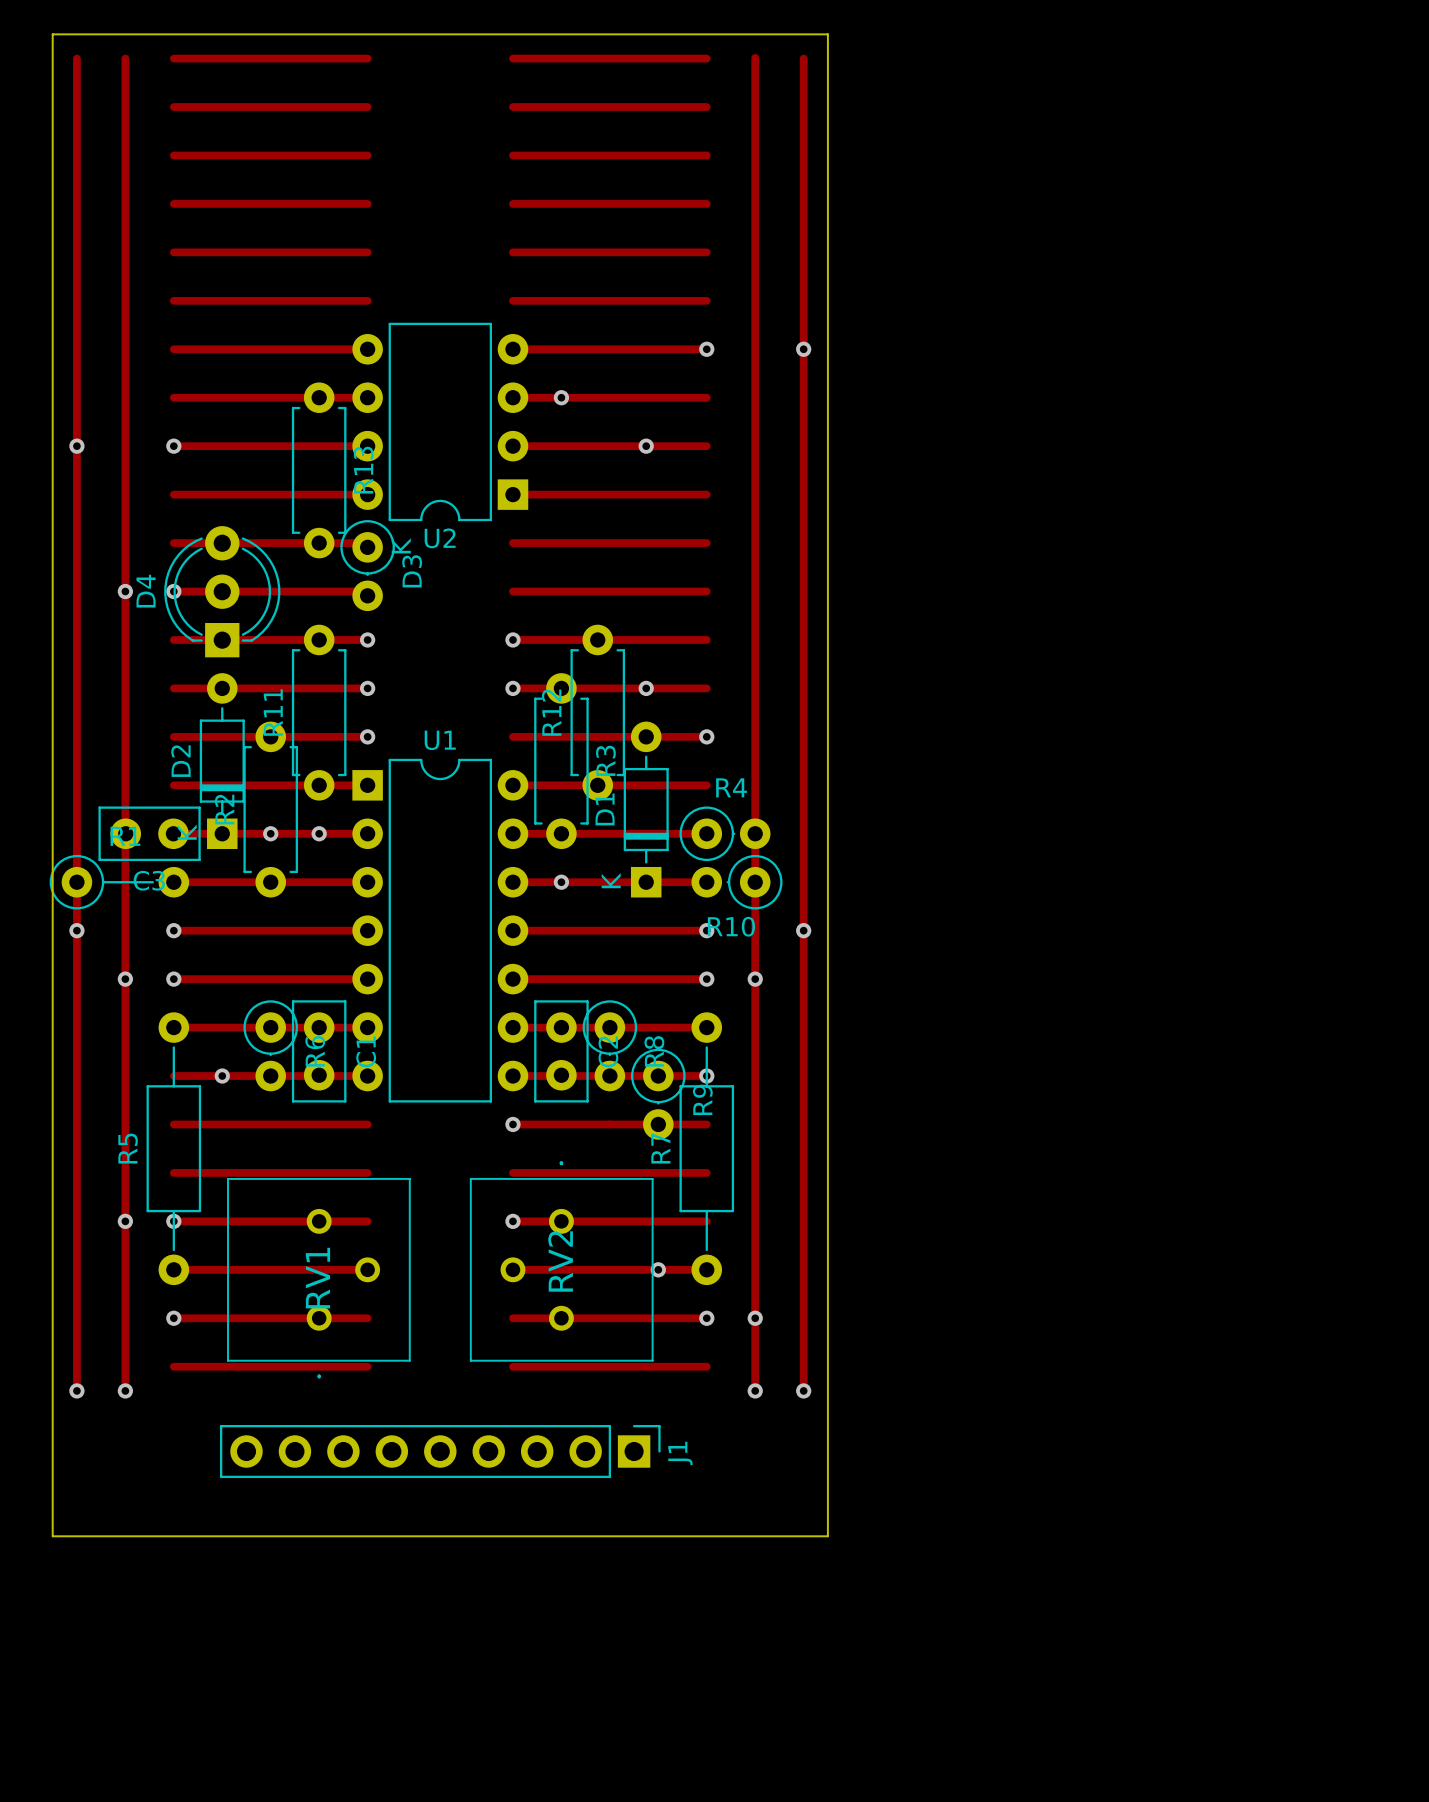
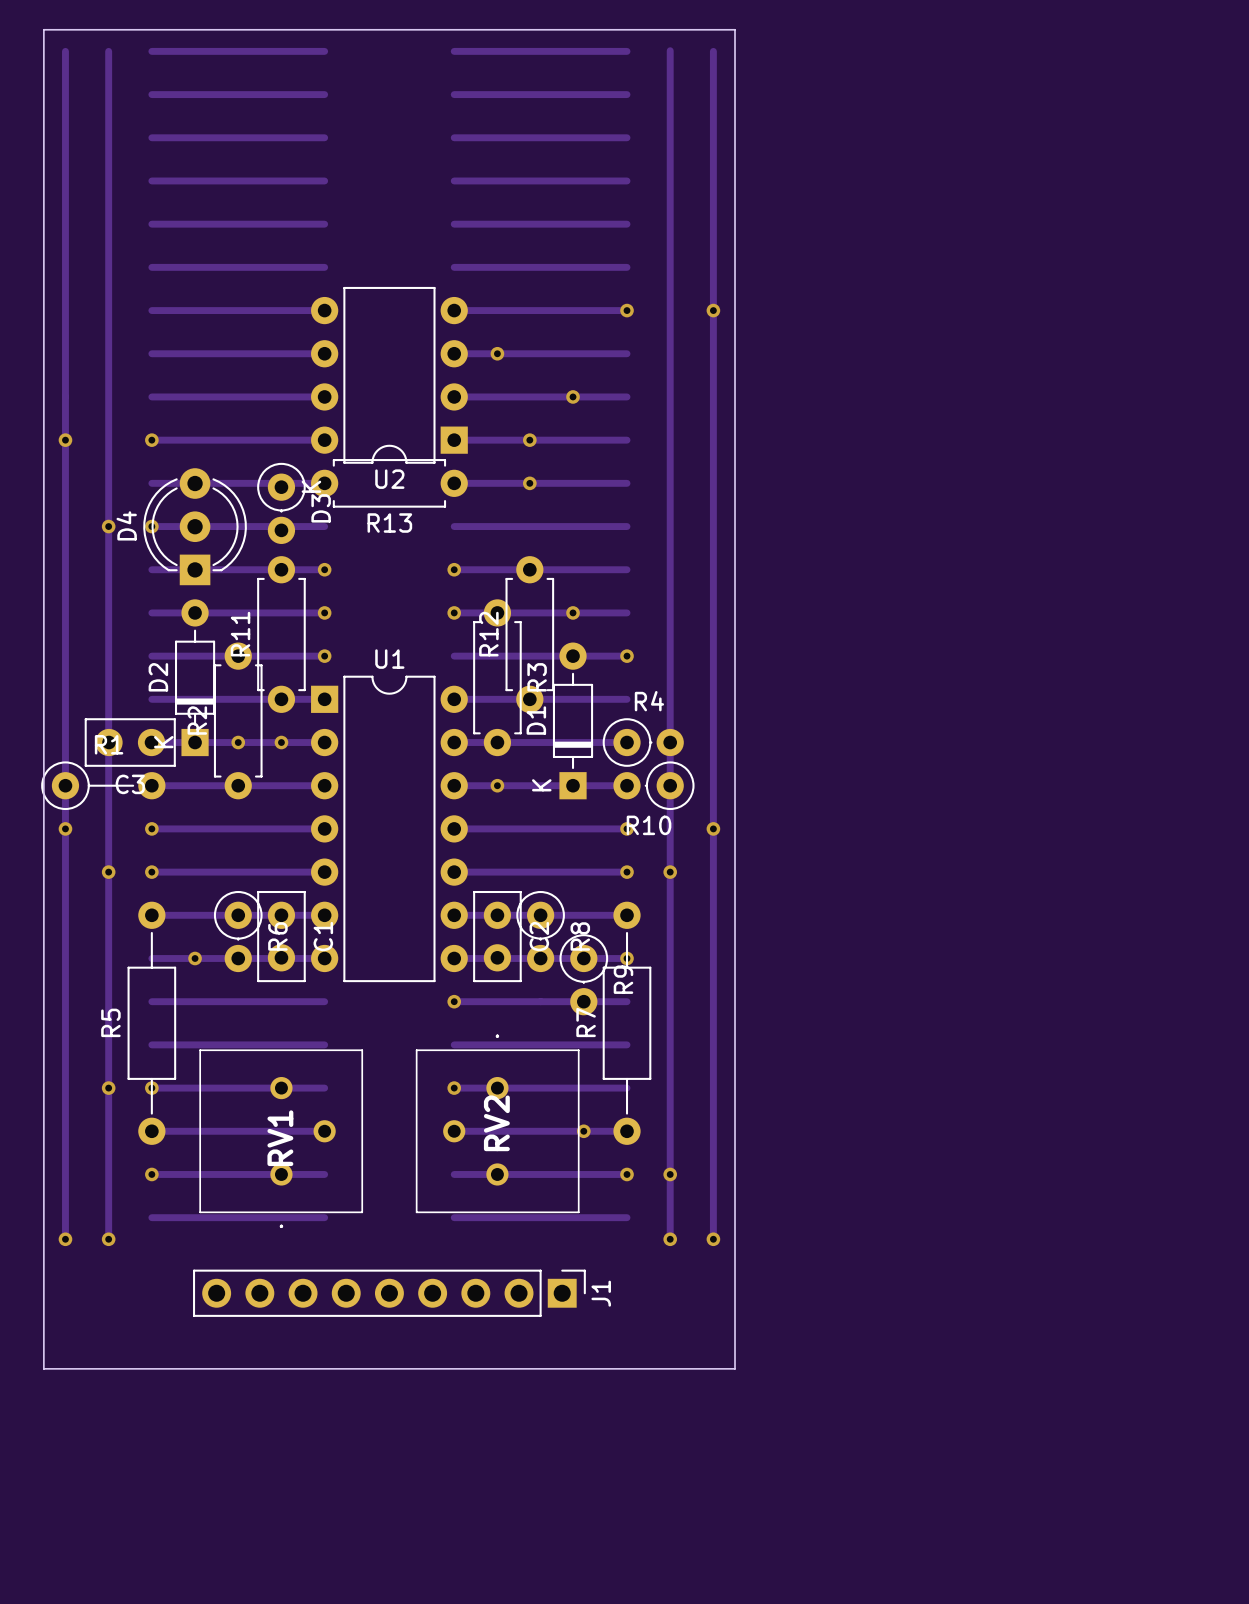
via position: (76, 446) -> (65, 440)
via position: (173, 446) -> (151, 440)
R13 rotation: 0° (319, 470) -> 90° clockwise (389, 483)
R13 position: (319, 470) -> (389, 483)
via: none -> (529, 440)
via: none -> (529, 483)
D3 position: (367, 565) -> (281, 503)

